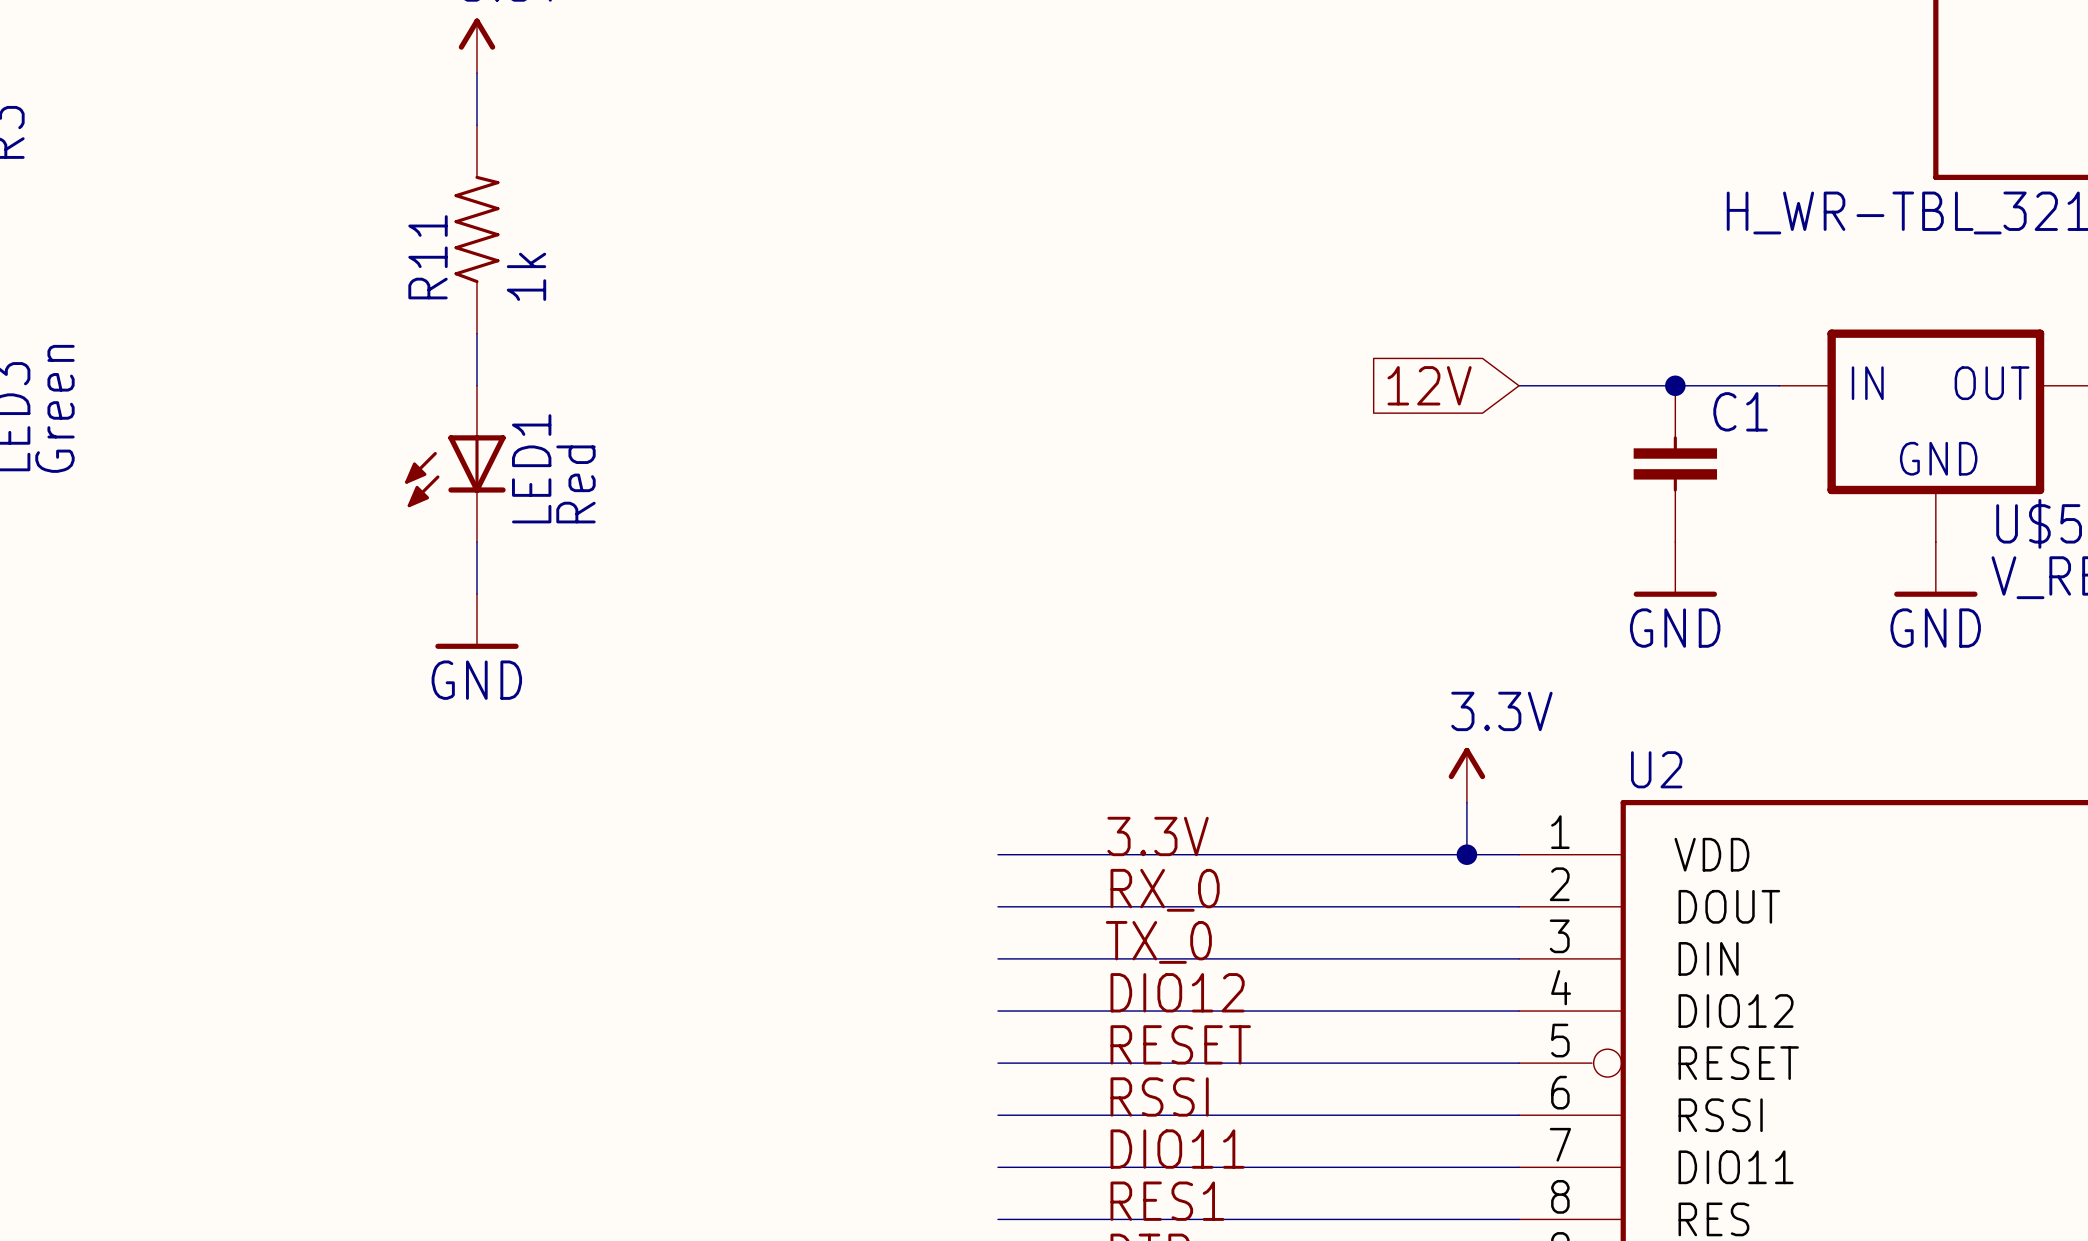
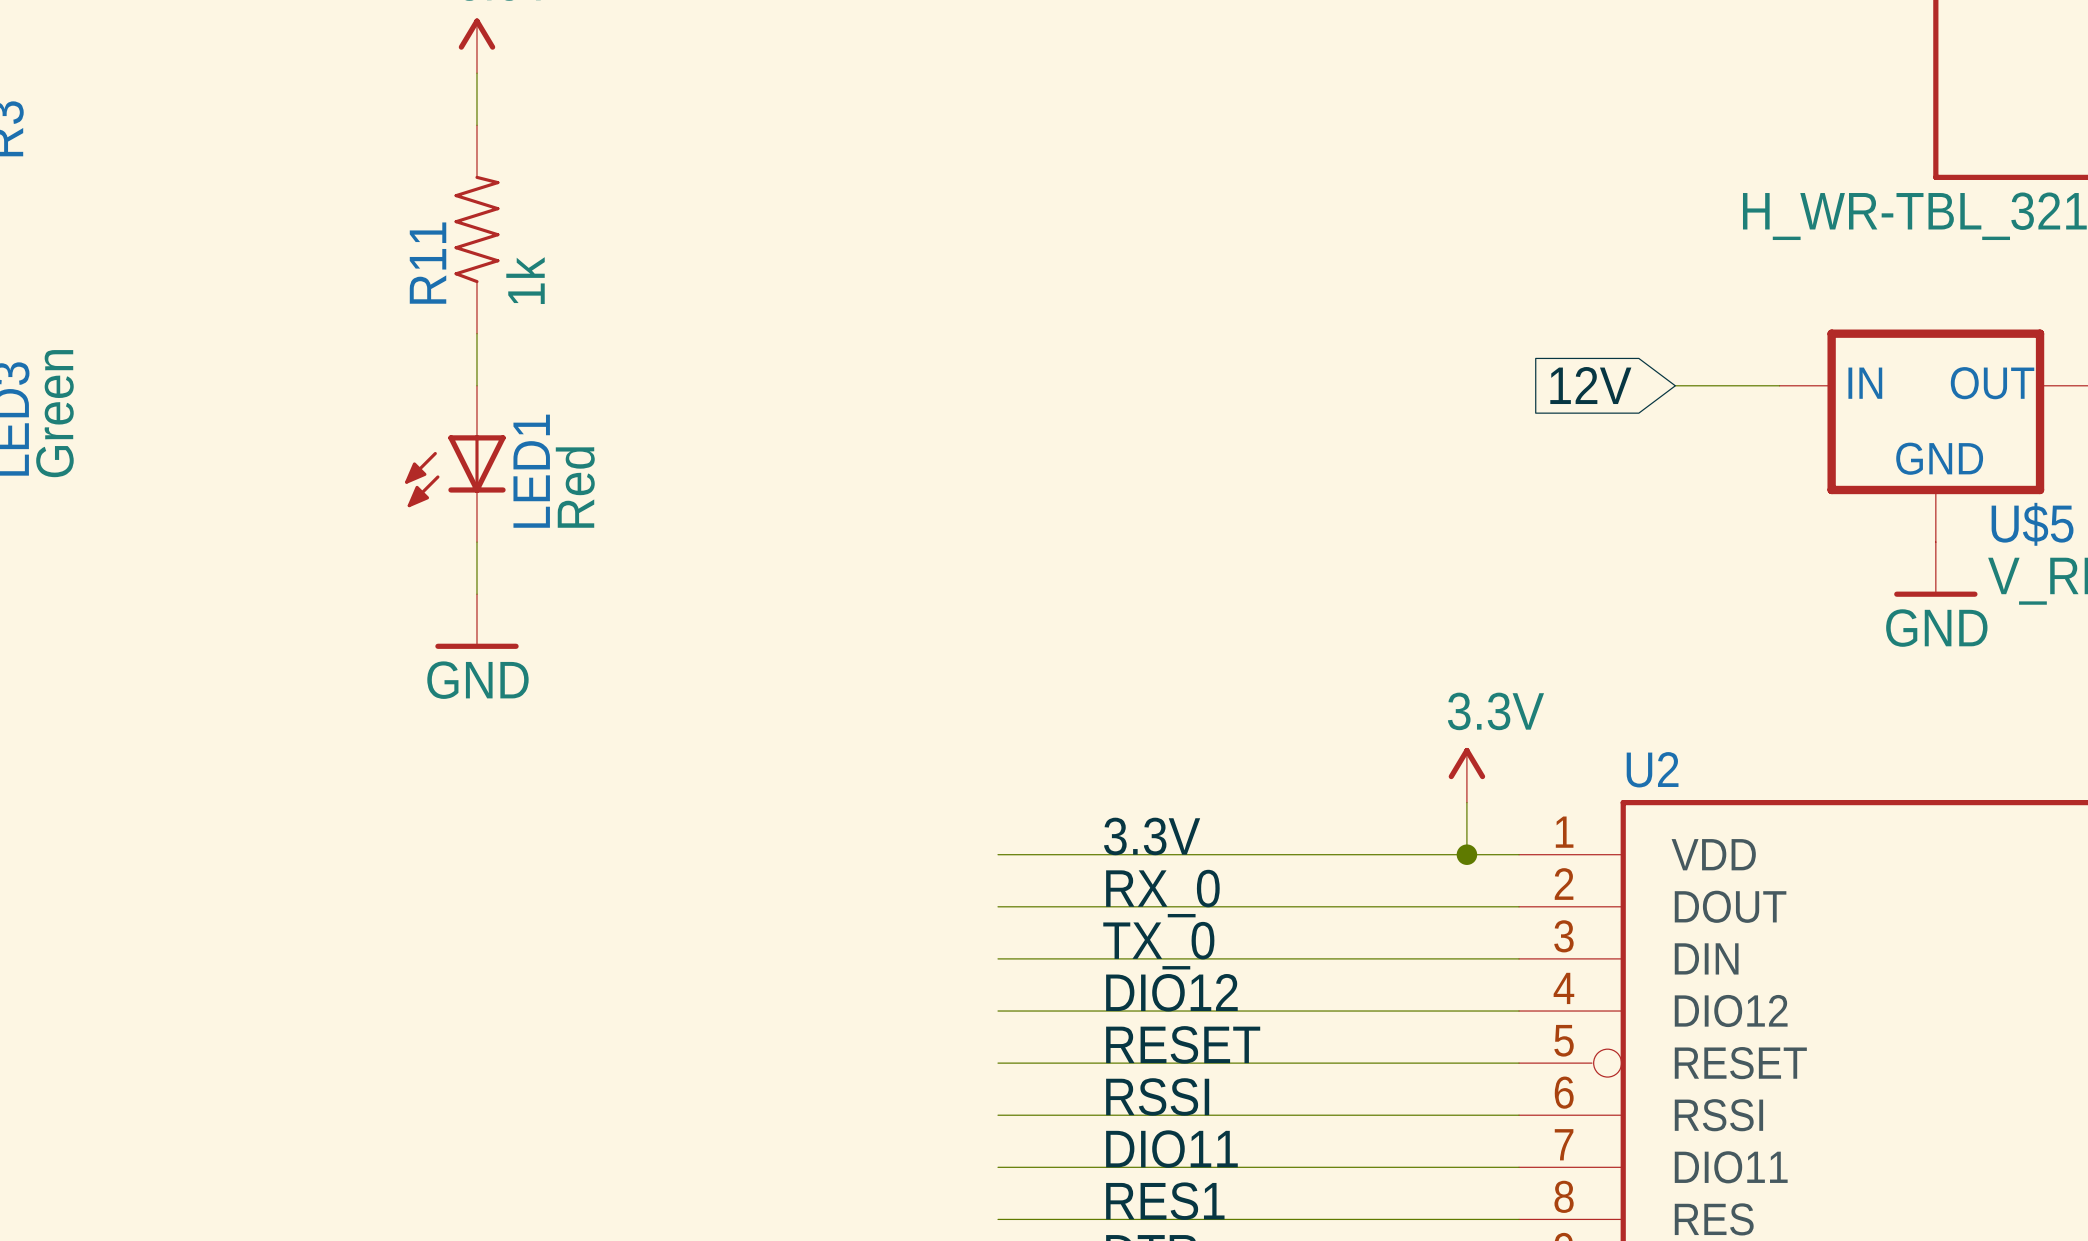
global label position: 12V (1429, 385) -> 12V (1590, 385)
wire: (1519, 385) (1675, 385) -> none
junction: (1675, 385) -> none
C1: (1675, 463) -> none
power symbol: GND (1675, 569) -> none

